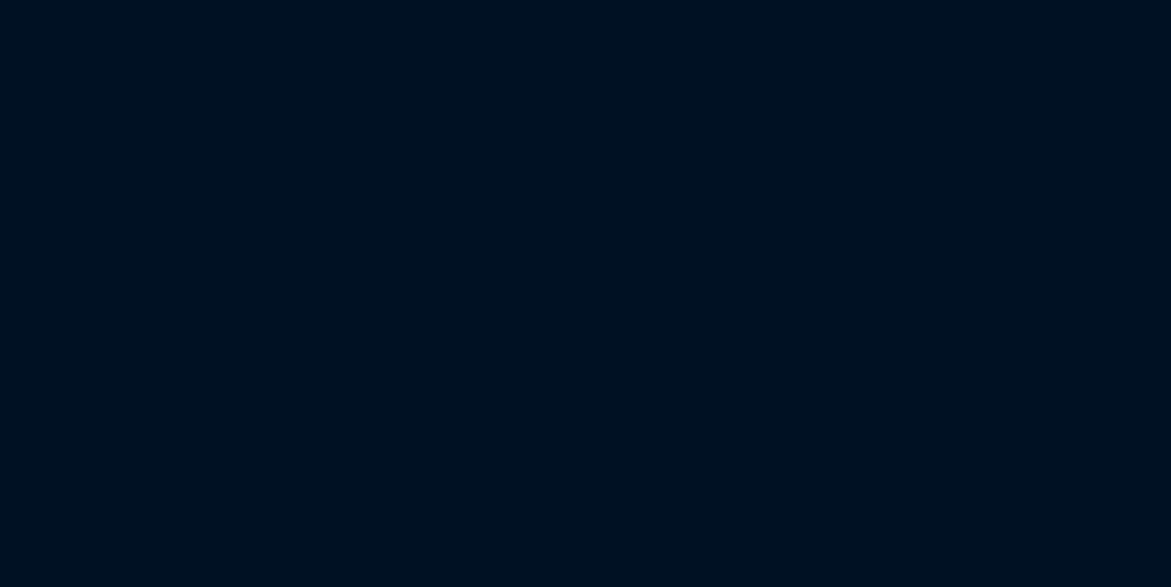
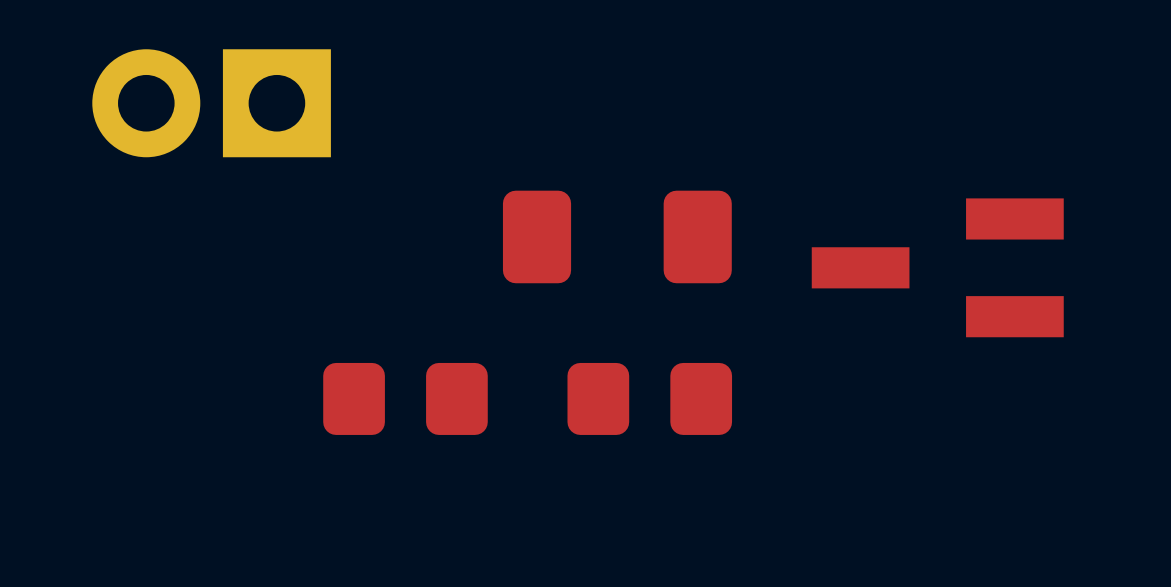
part: none -> (211, 103)
part: none -> (617, 236)
part: none -> (937, 267)
part: none -> (405, 398)
part: none -> (649, 398)

